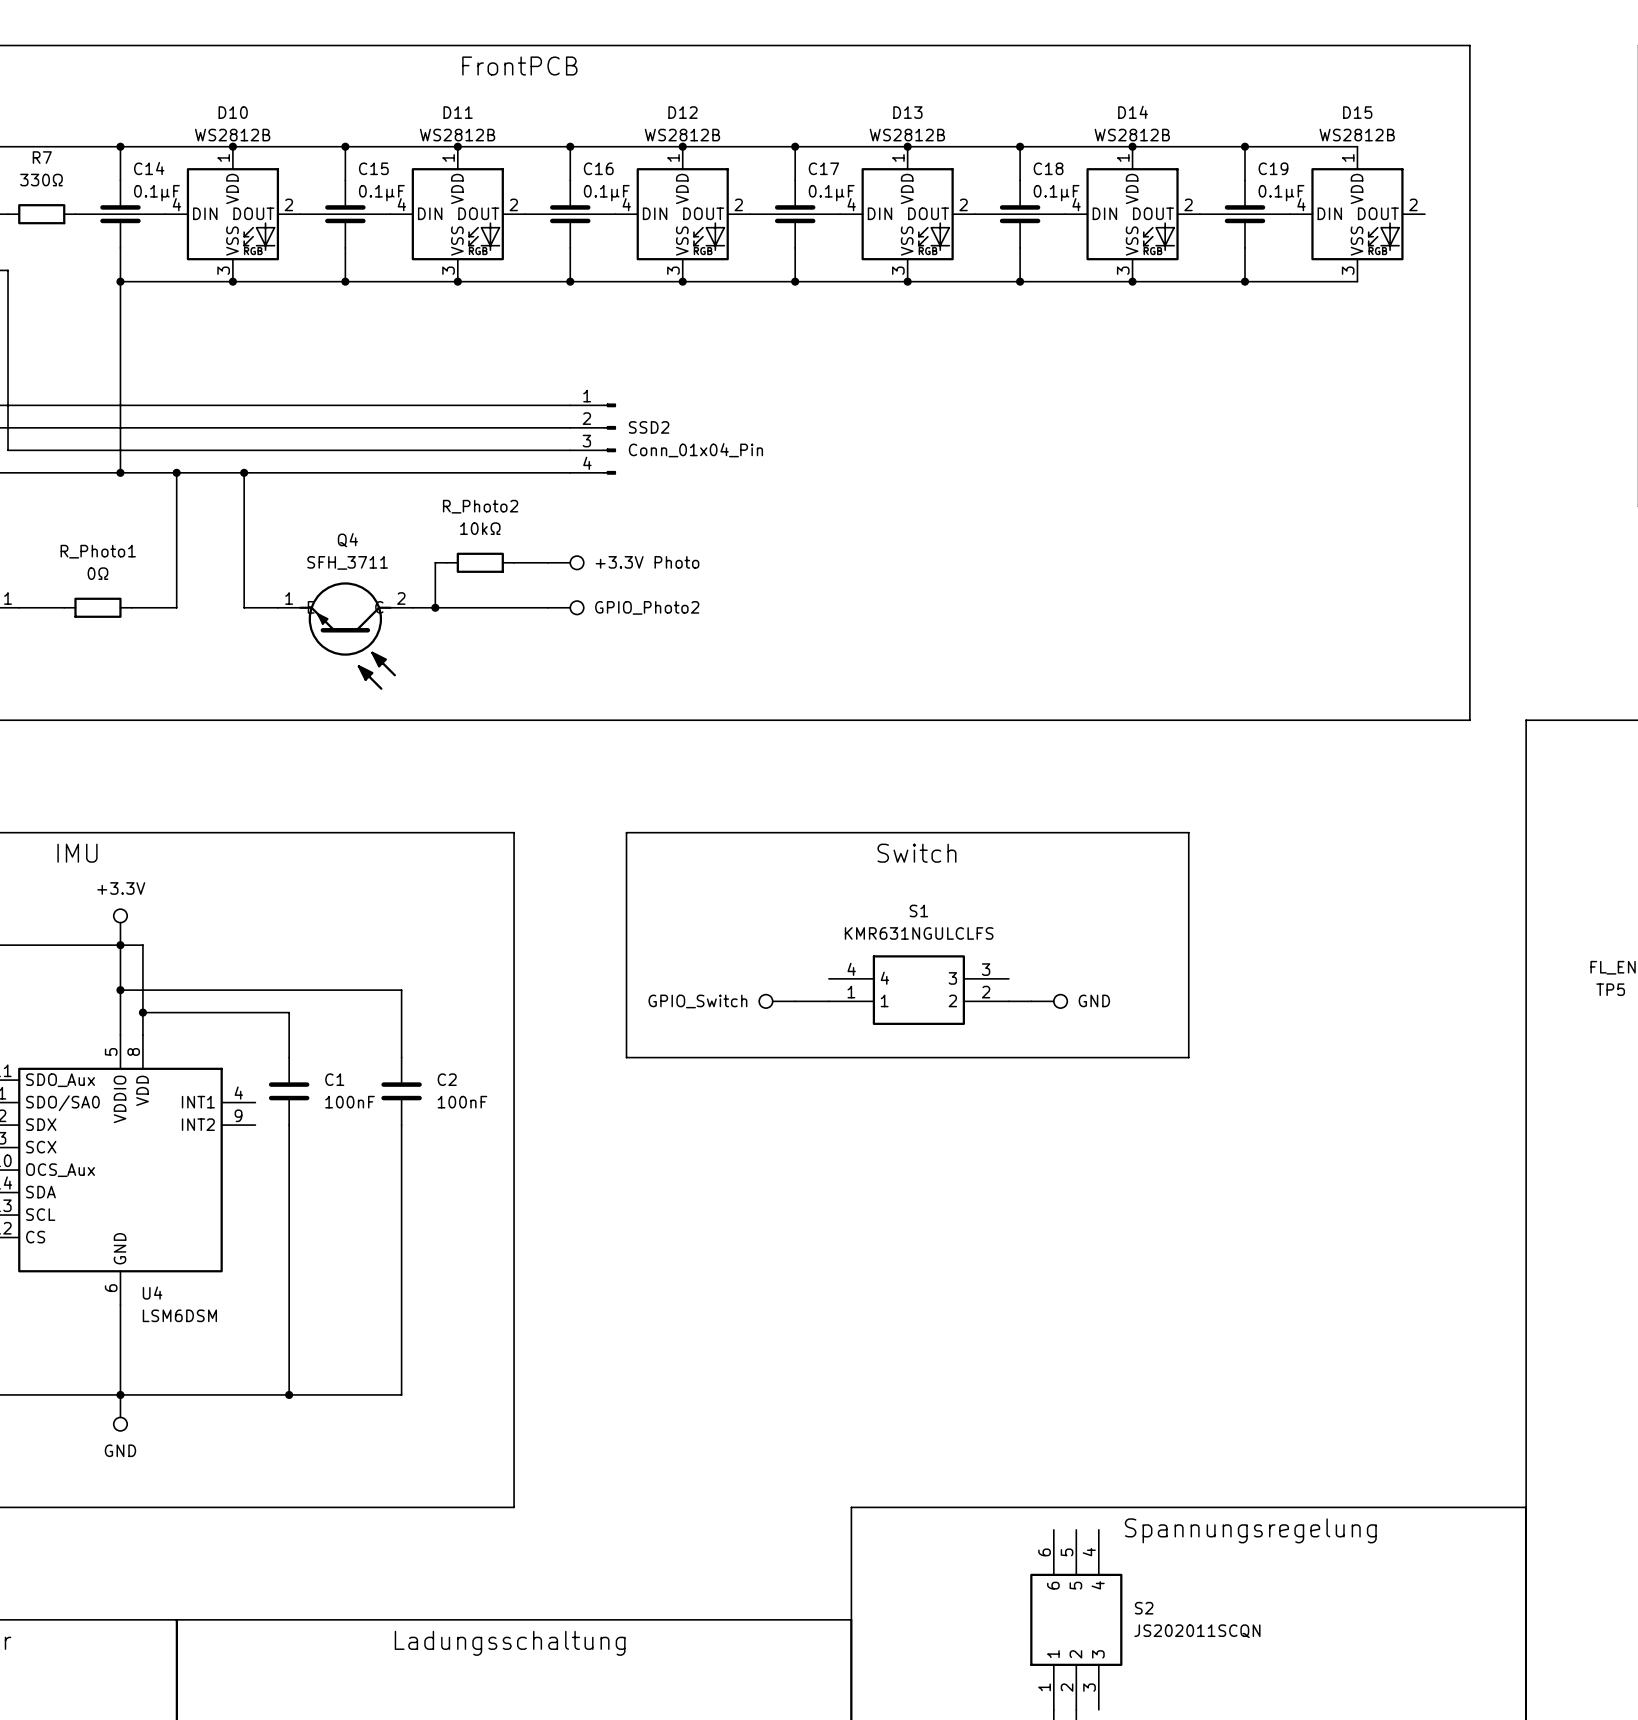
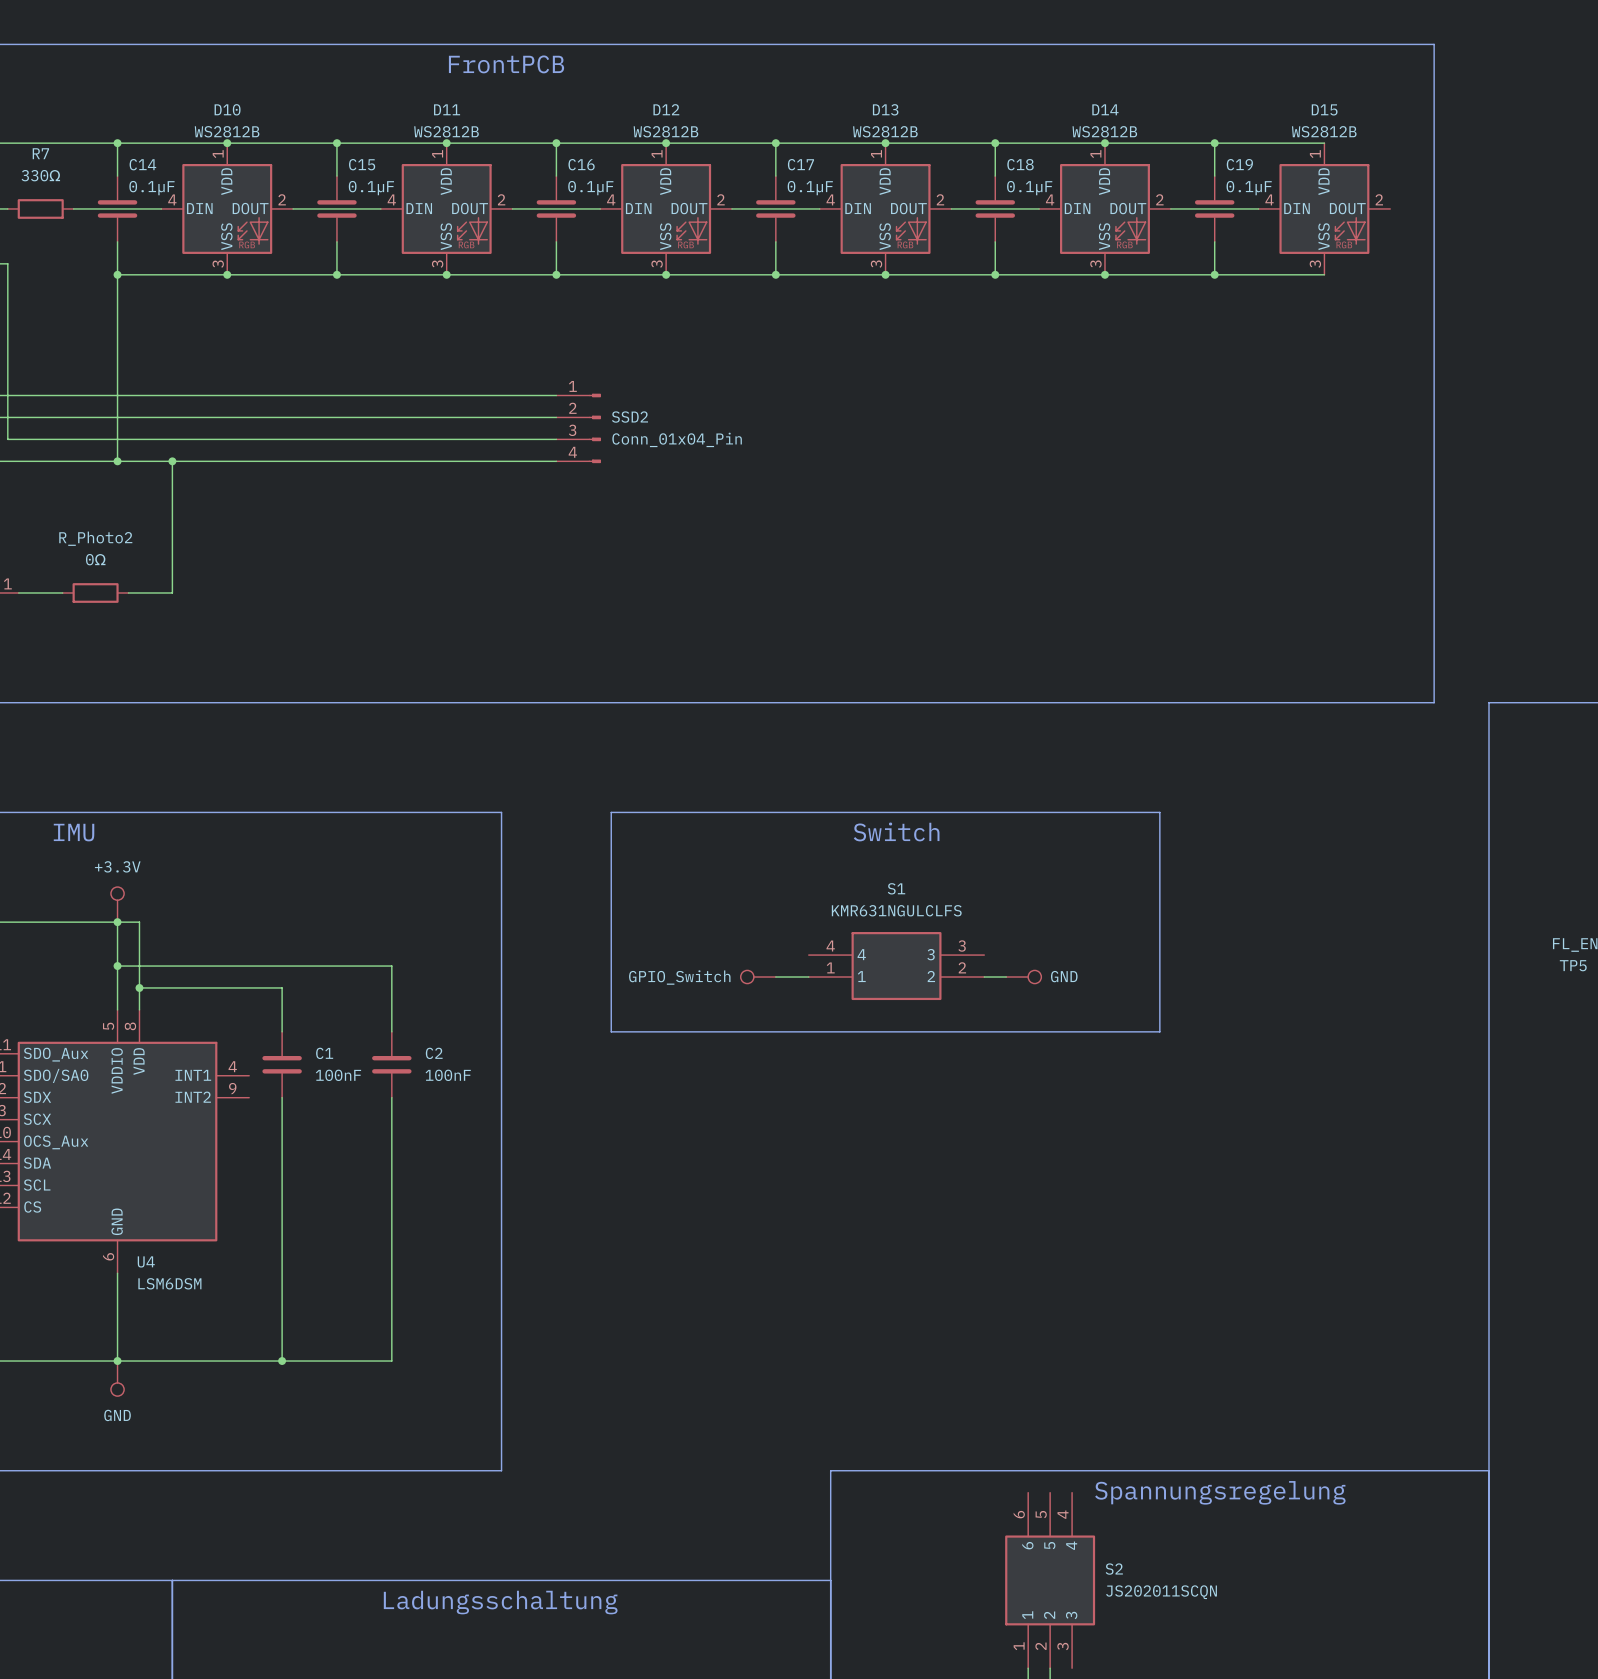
wire: (244, 472) (244, 607) (277, 607) -> none
junction: (244, 472) -> none
R_Photo1 name: R_Photo1 (98, 551) -> R_Photo2 (95, 538)
wire: (446, 562) (435, 562) (435, 607) -> none
R_Photo2: 10kΩ (480, 562) -> none
wire: (514, 562) (547, 562) -> none
part: +3.3V Photo (565, 562) -> none
wire: (412, 607) (547, 607) -> none
junction: (435, 607) -> none
part: GPIO_Photo2 (565, 607) -> none
Q4: SFH_3711 (345, 636) -> none

